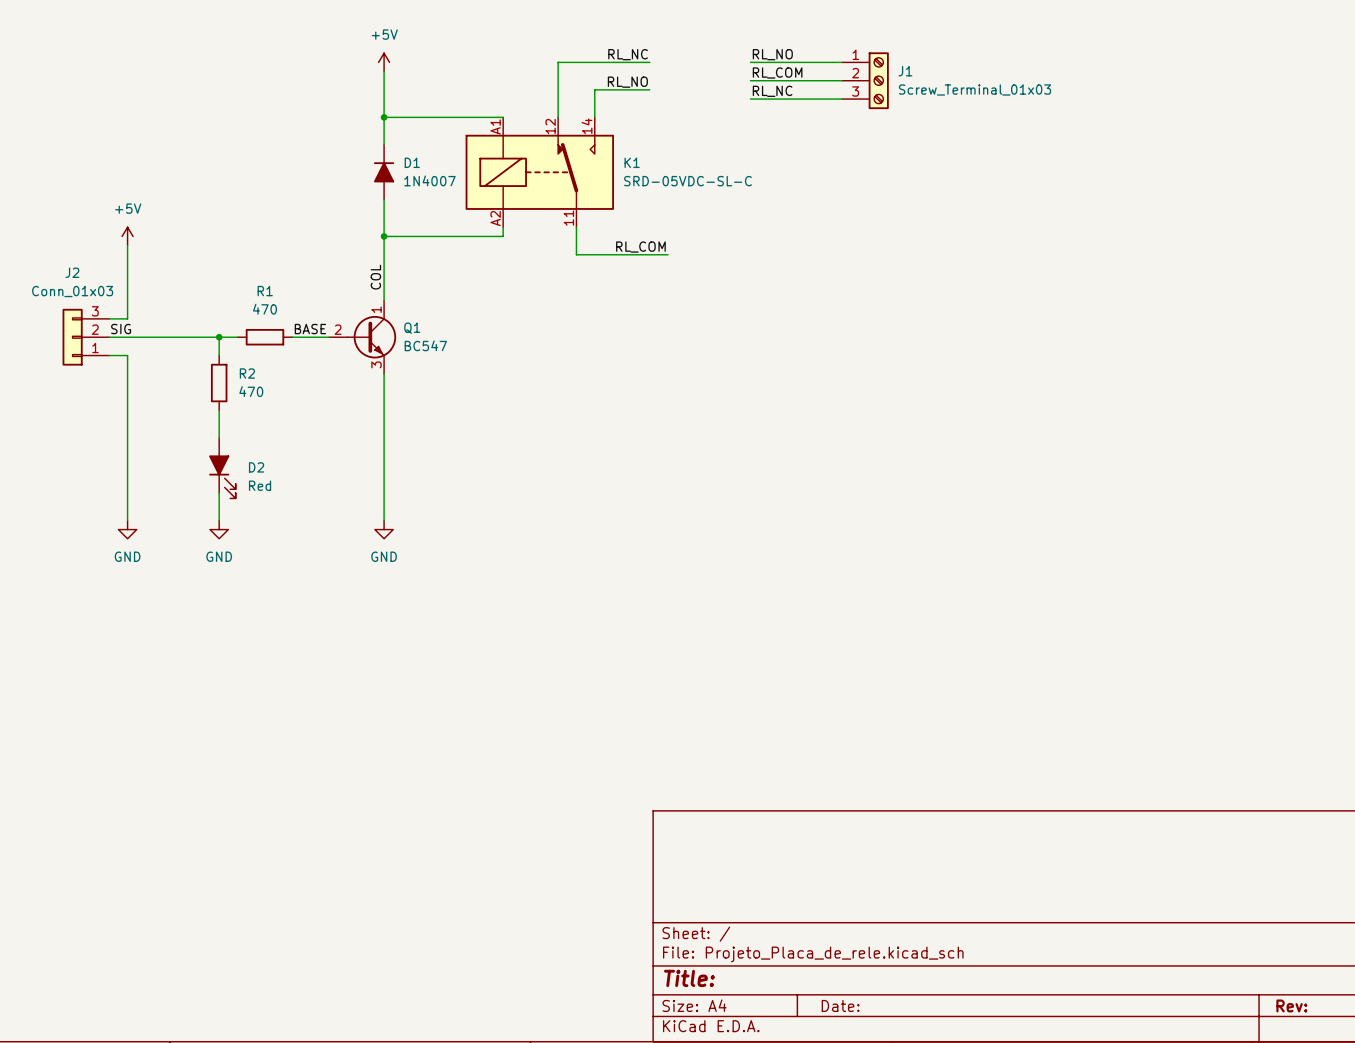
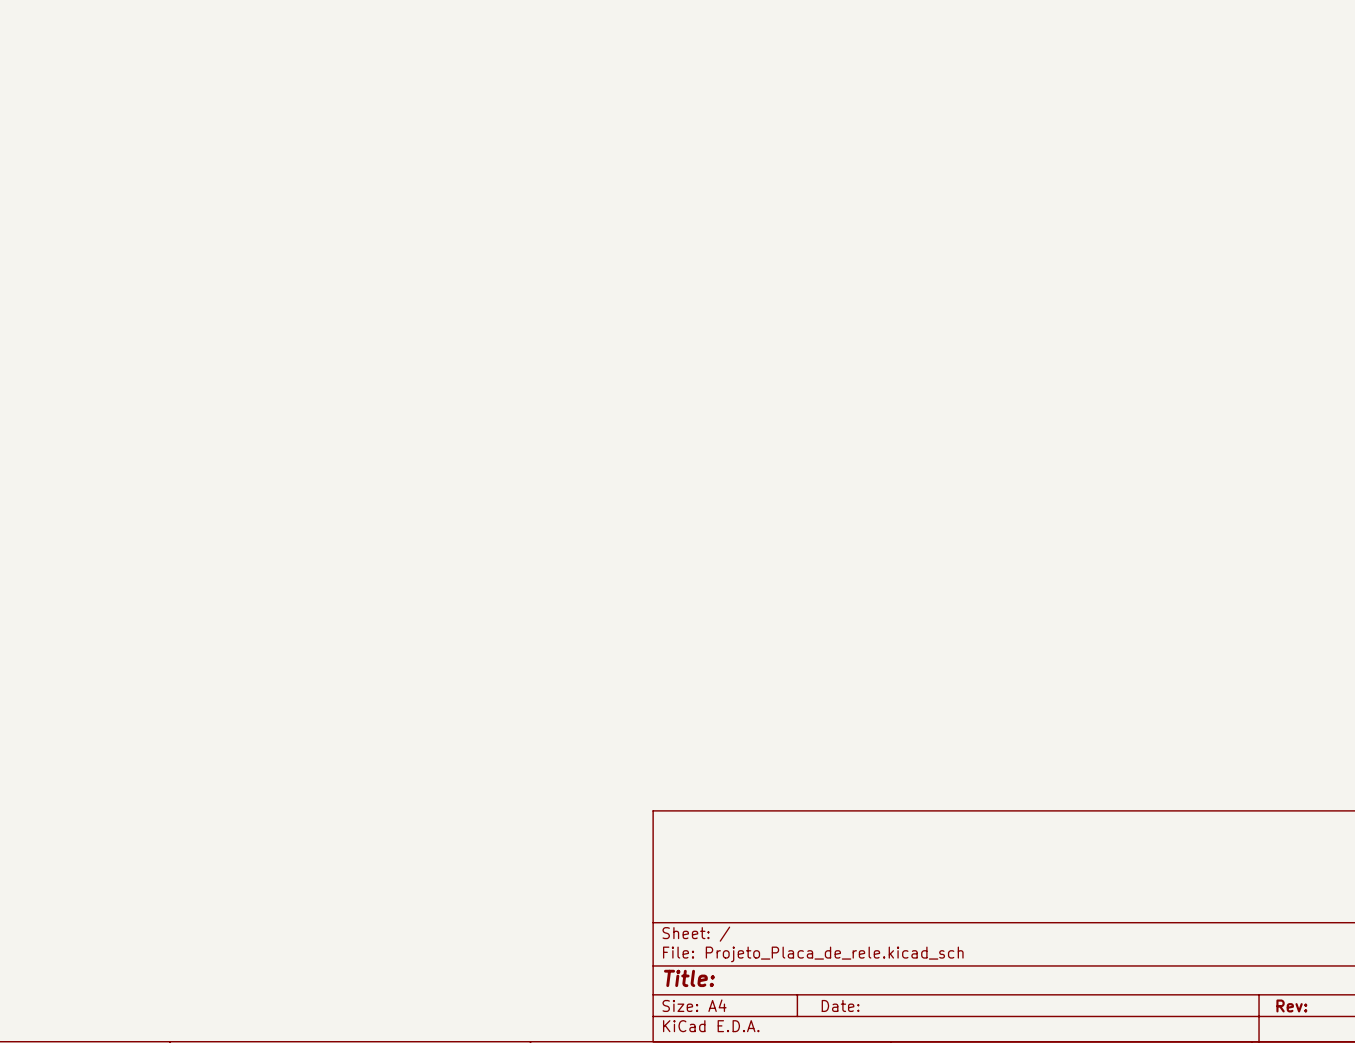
label: RL_NC (628, 54) -> none
label: RL_NO (772, 54) -> none
power symbol: +5V (384, 62) -> none
wire: (649, 62) (558, 62) (558, 117) -> none
wire: (750, 62) (842, 62) -> none
wire: (384, 71) (384, 144) -> none
label: RL_COM (777, 72) -> none
wire: (750, 80) (842, 80) -> none
J1: Screw_Terminal_01x03 (865, 80) -> none
label: RL_NO (627, 82) -> none
wire: (649, 89) (594, 89) (594, 117) -> none
label: RL_NC (772, 91) -> none
wire: (750, 99) (842, 99) -> none
wire: (384, 117) (503, 117) -> none
junction: (384, 117) -> none
D1: 1N4007 (384, 172) -> none
K1: SRD-05VDC-SL-C (539, 172) -> none
wire: (384, 199) (384, 300) -> none
wire: (503, 227) (503, 236) (384, 236) -> none
wire: (576, 227) (576, 254) (668, 254) -> none
power symbol: +5V (127, 236) -> none
junction: (384, 236) -> none
wire: (127, 245) (127, 318) (109, 318) -> none
label: RL_COM (640, 247) -> none
label: COL (375, 277) -> none
label: SIG (121, 329) -> none
label: BASE (310, 329) -> none
J2: Conn_01x03 (85, 337) -> none
wire: (109, 337) (237, 337) -> none
wire: (219, 337) (219, 355) -> none
junction: (219, 337) -> none
R1: 470 (264, 337) -> none
wire: (292, 337) (329, 337) -> none
Q1: BC547 (362, 337) -> none
wire: (109, 355) (127, 355) (127, 520) -> none
wire: (384, 373) (384, 520) -> none
R2: 470 (219, 383) -> none
wire: (219, 410) (219, 437) -> none
D2: Red (222, 468) -> none
wire: (219, 492) (219, 520) -> none
power symbol: GND (127, 529) -> none
power symbol: GND (219, 529) -> none
power symbol: GND (384, 529) -> none

